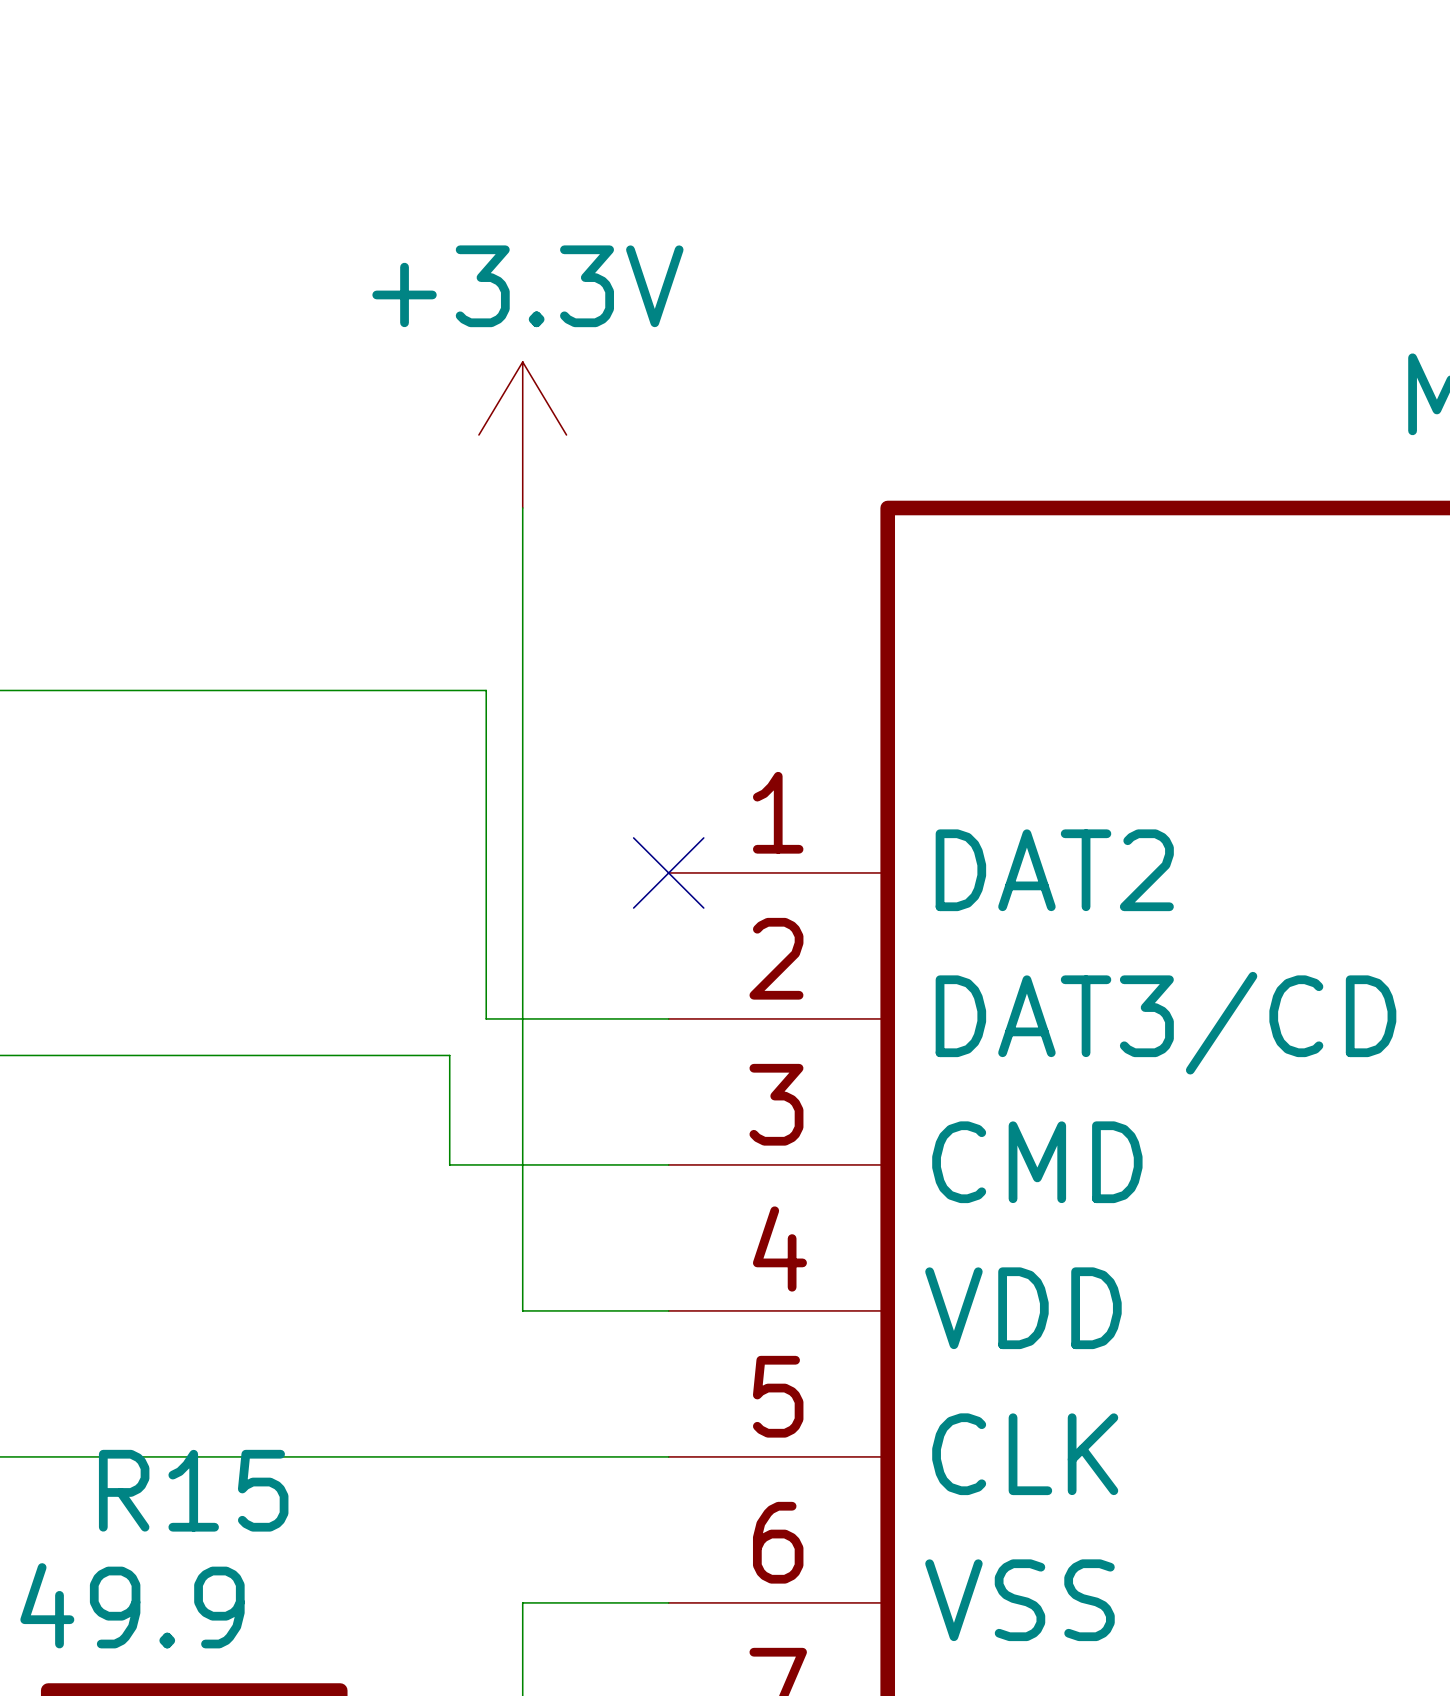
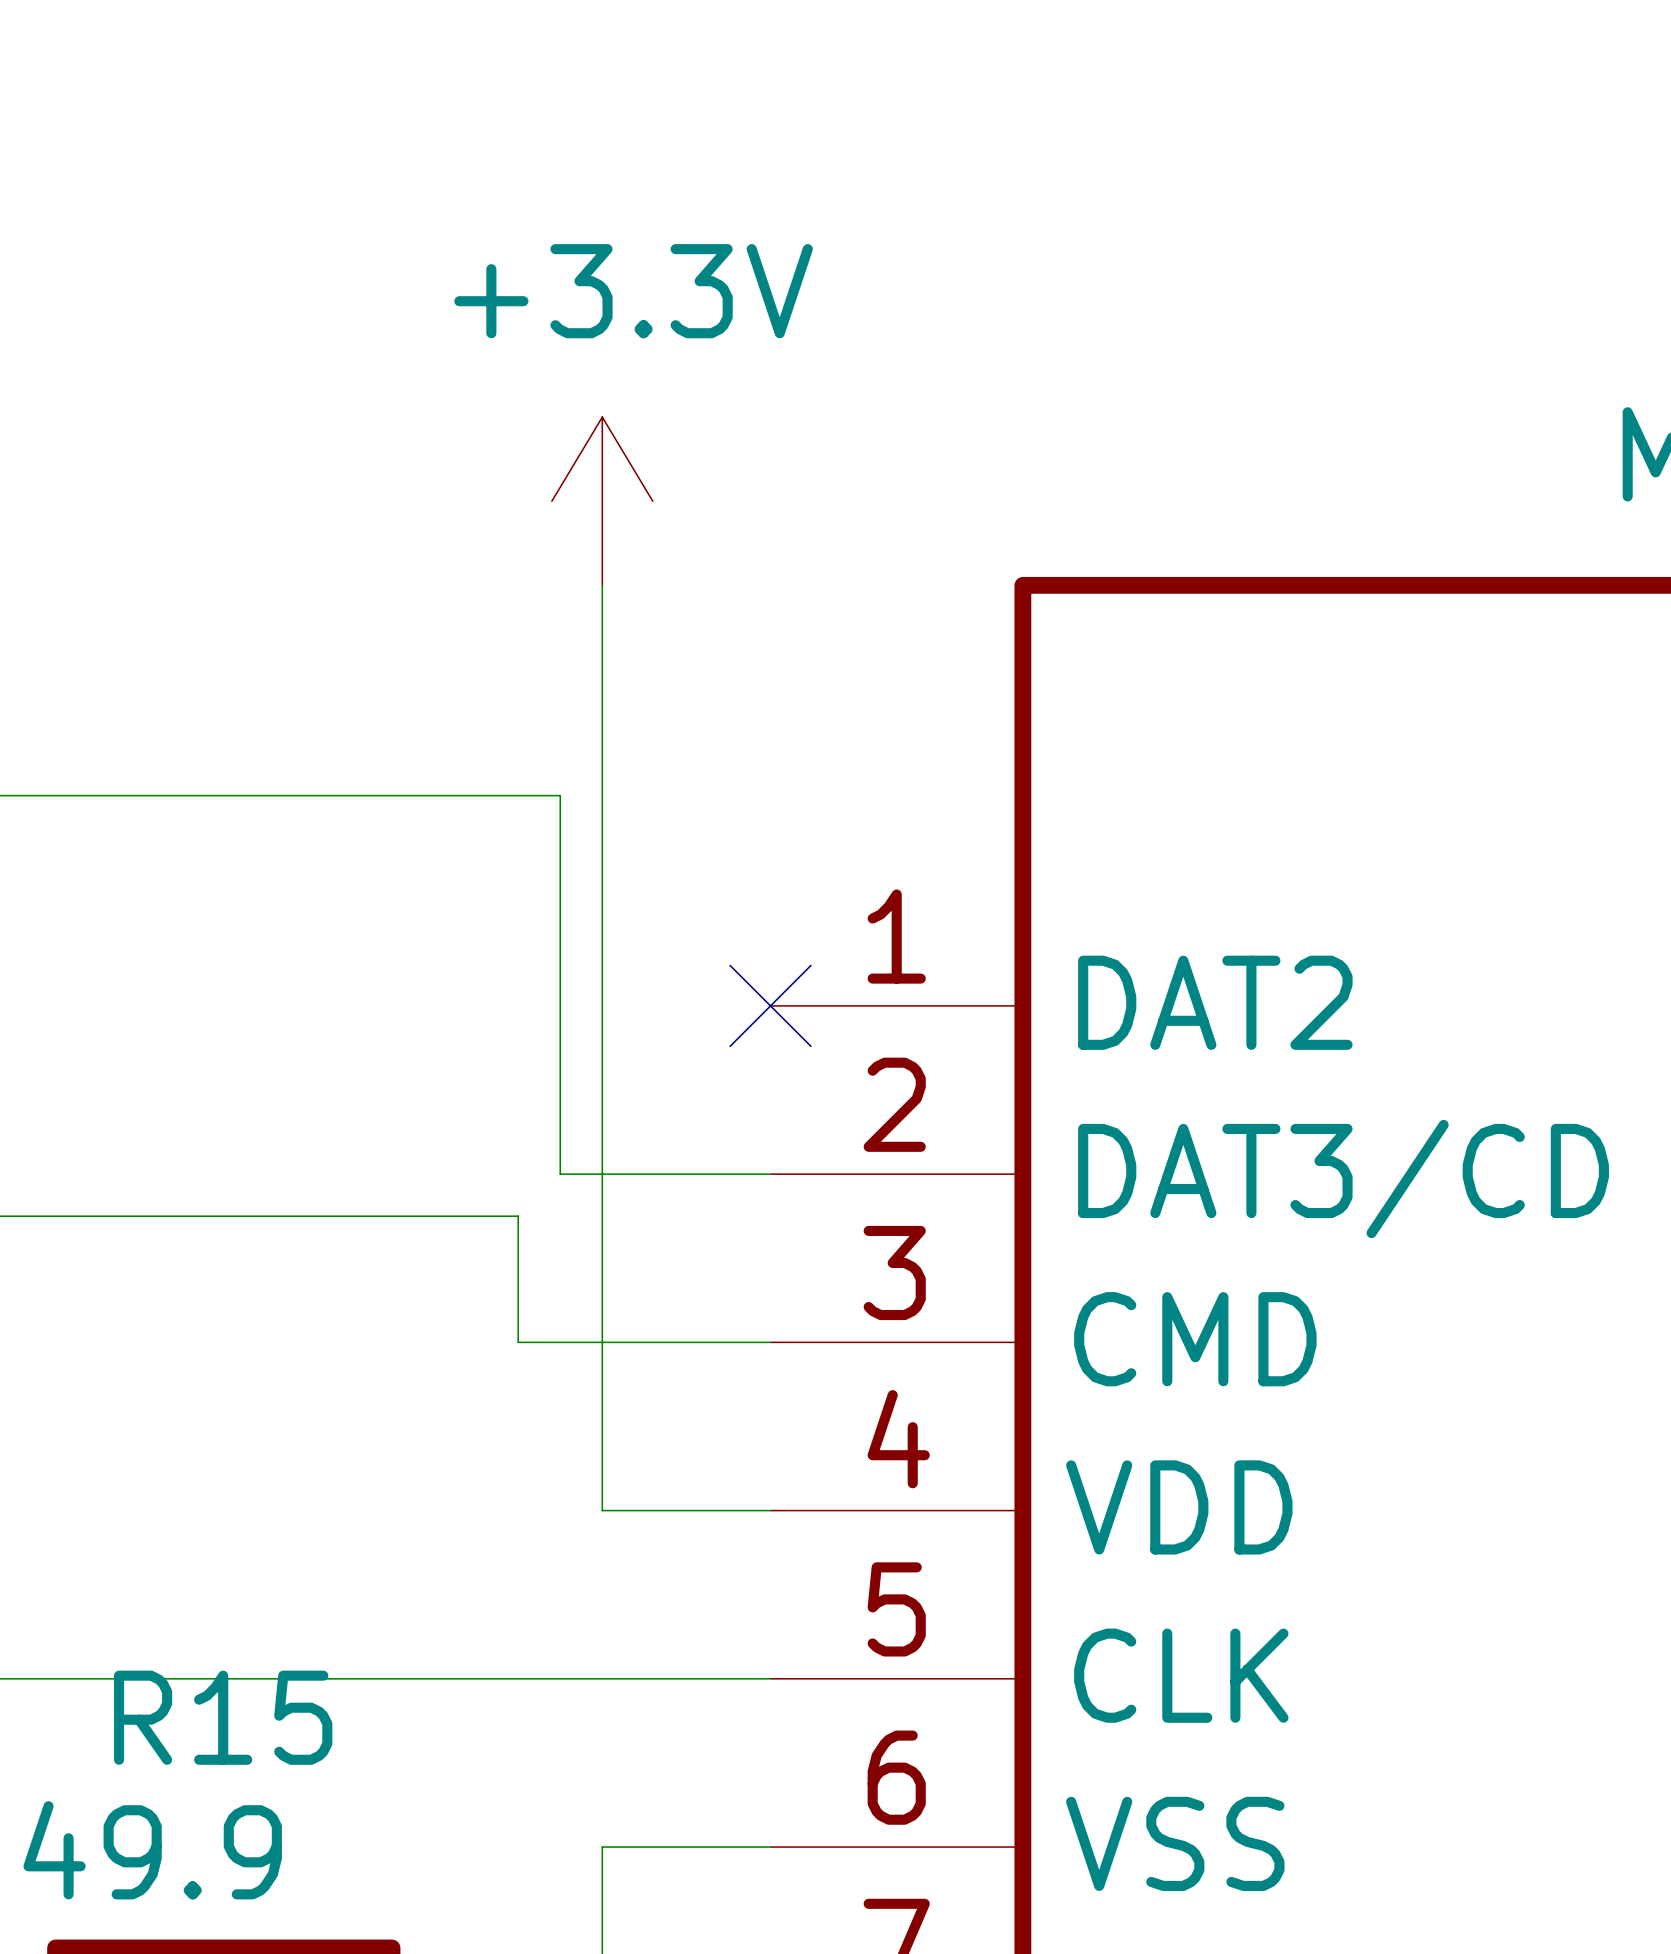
power symbol text position: +3.3V (527, 286) -> +3.3V (633, 291)

